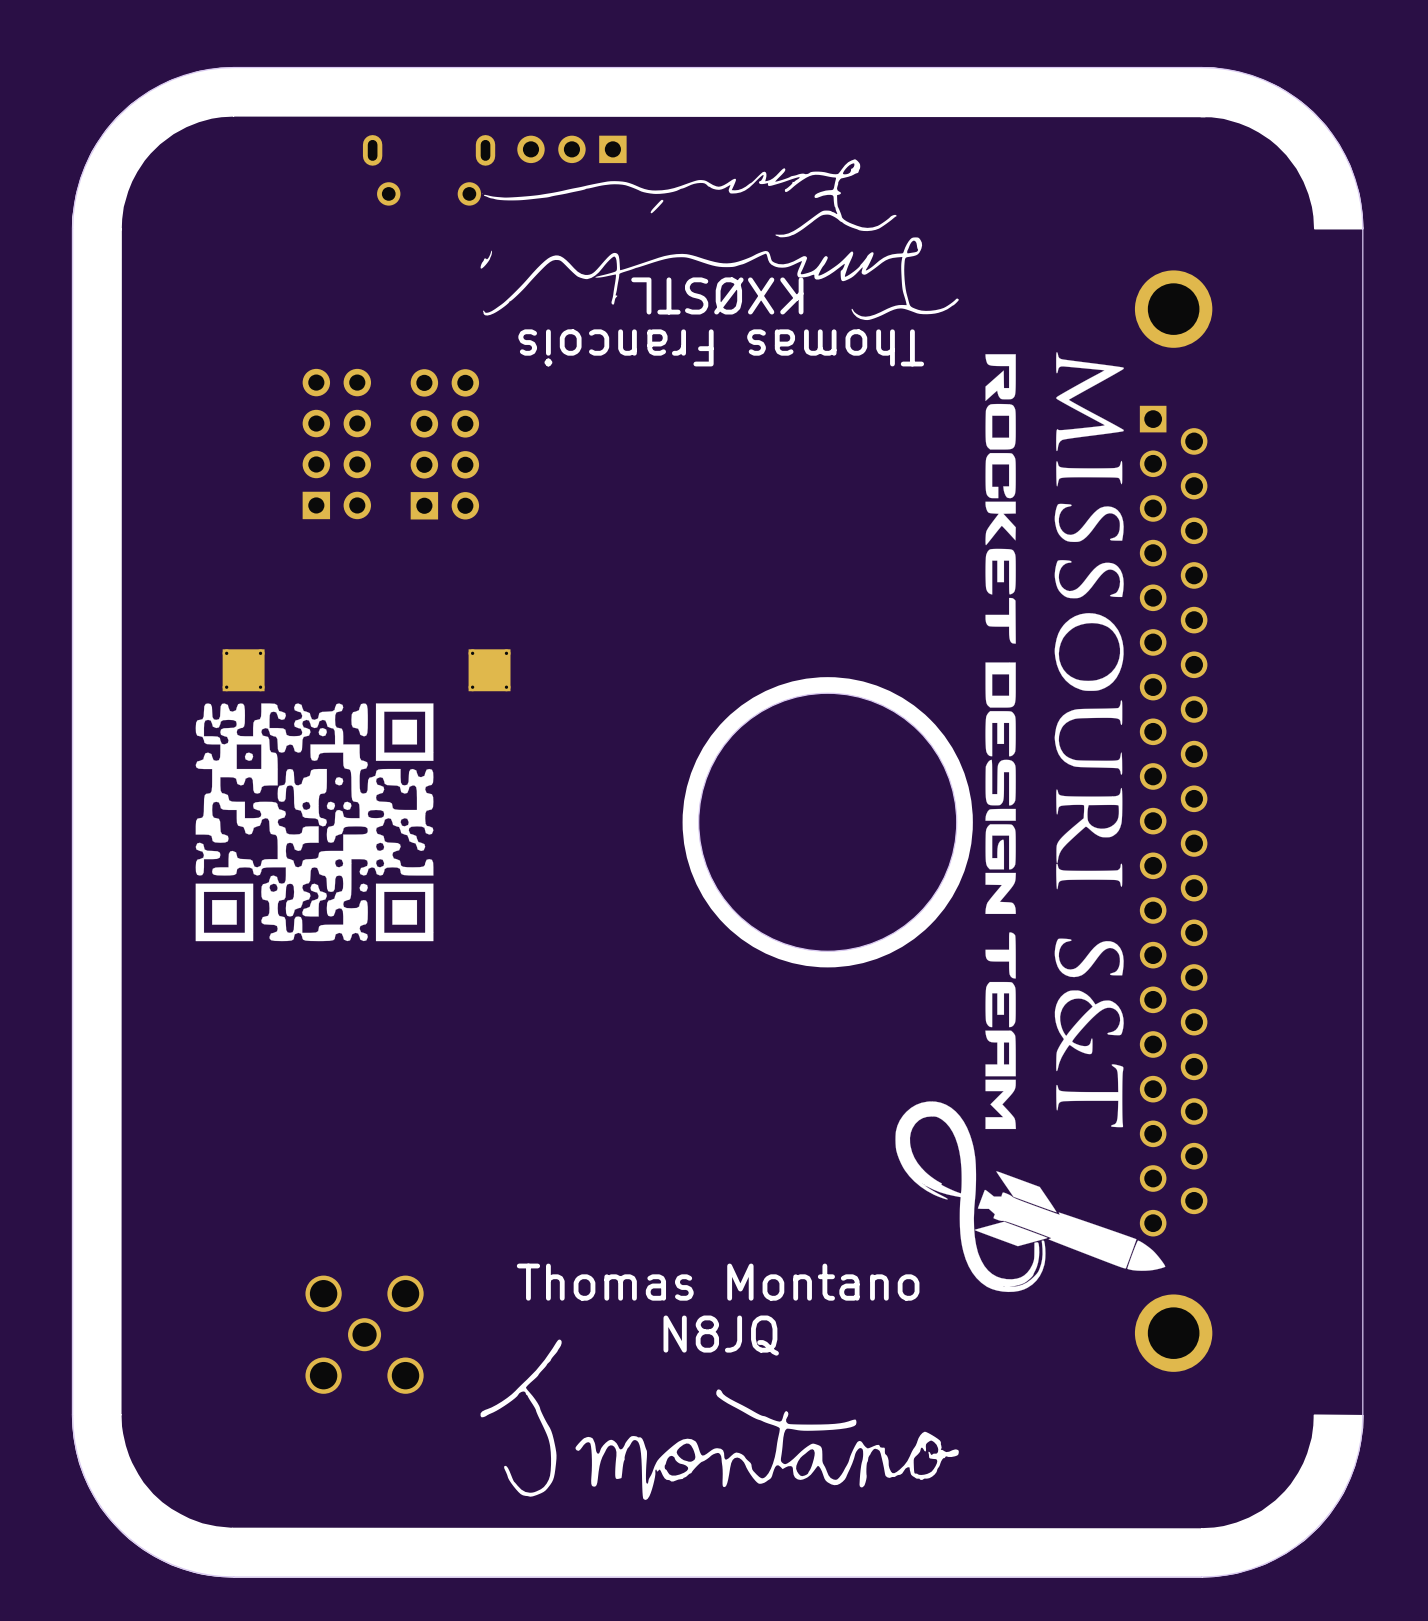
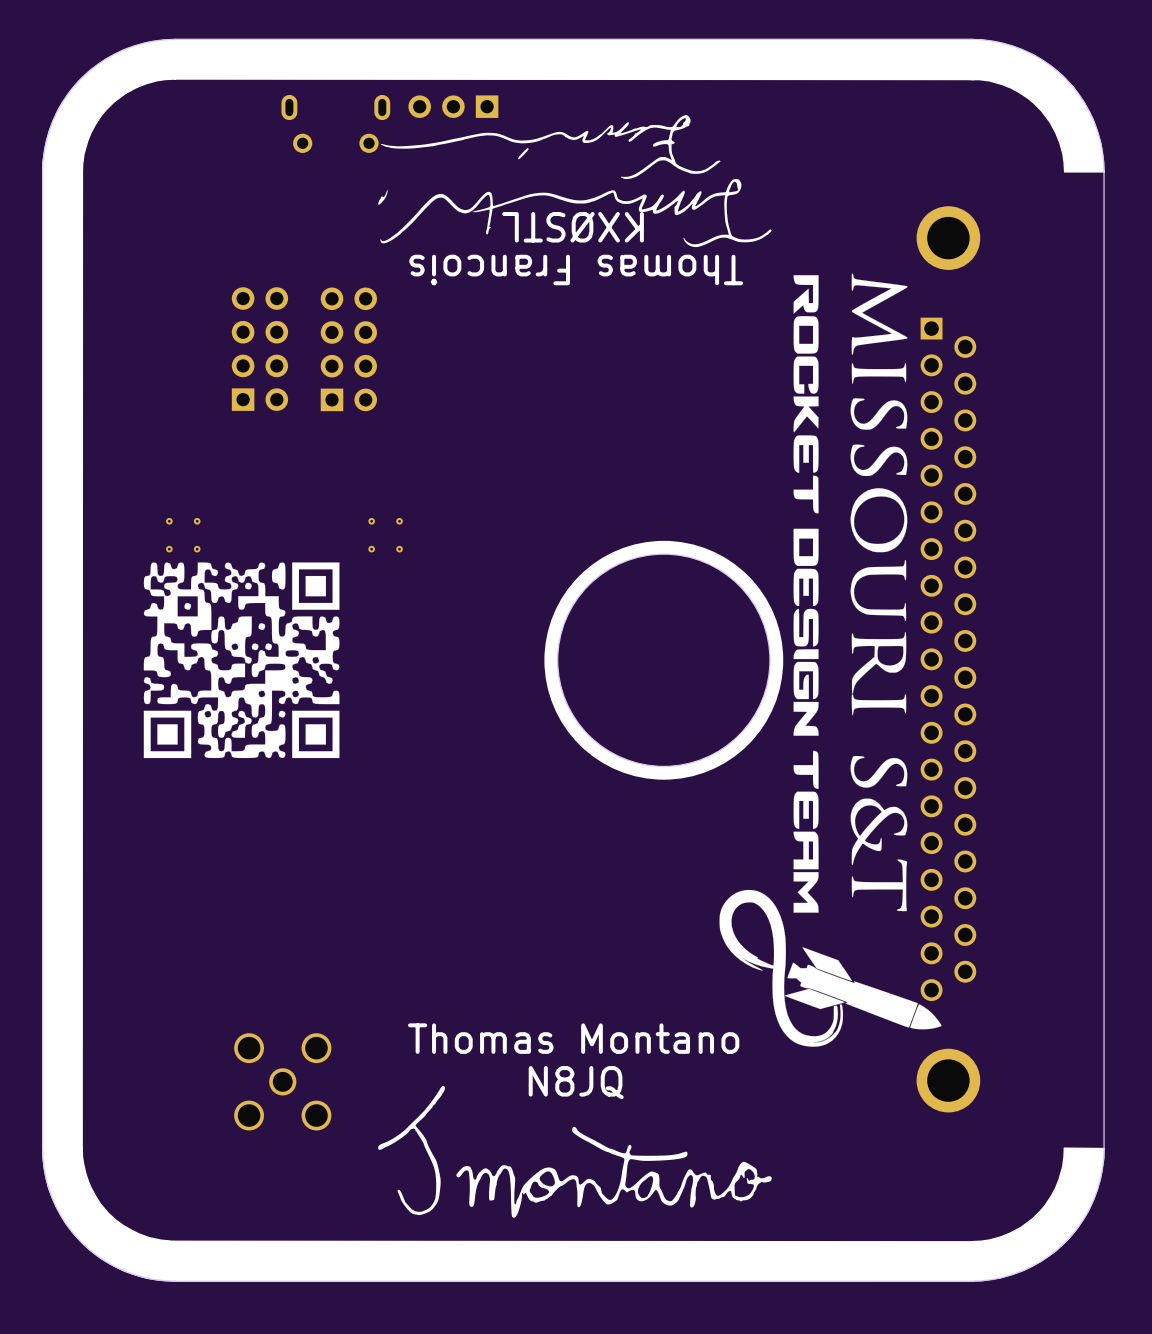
part footprint: [222, 649, 265, 692] -> [166, 517, 201, 553]
part footprint: [468, 649, 511, 692] -> [368, 517, 403, 553]

